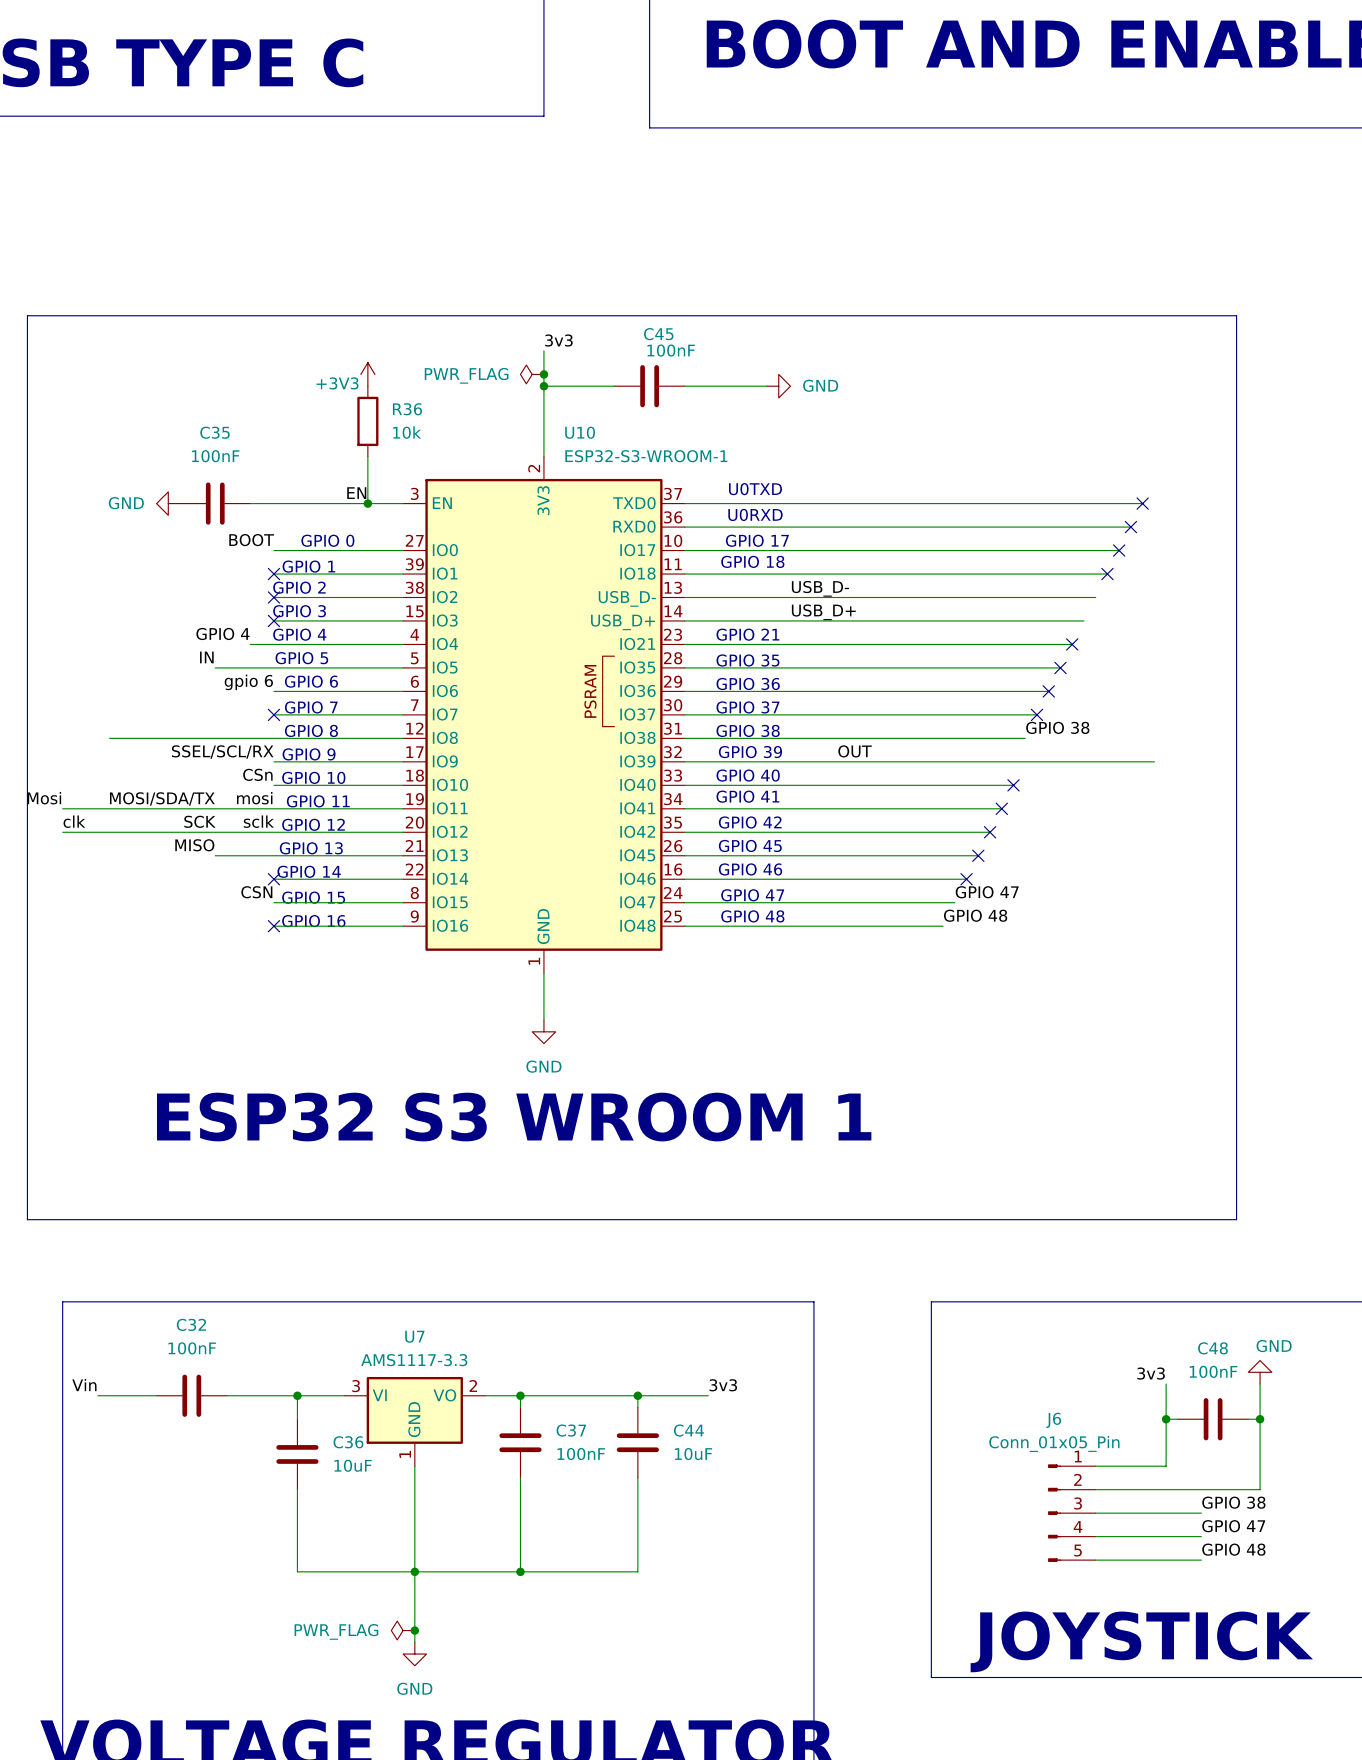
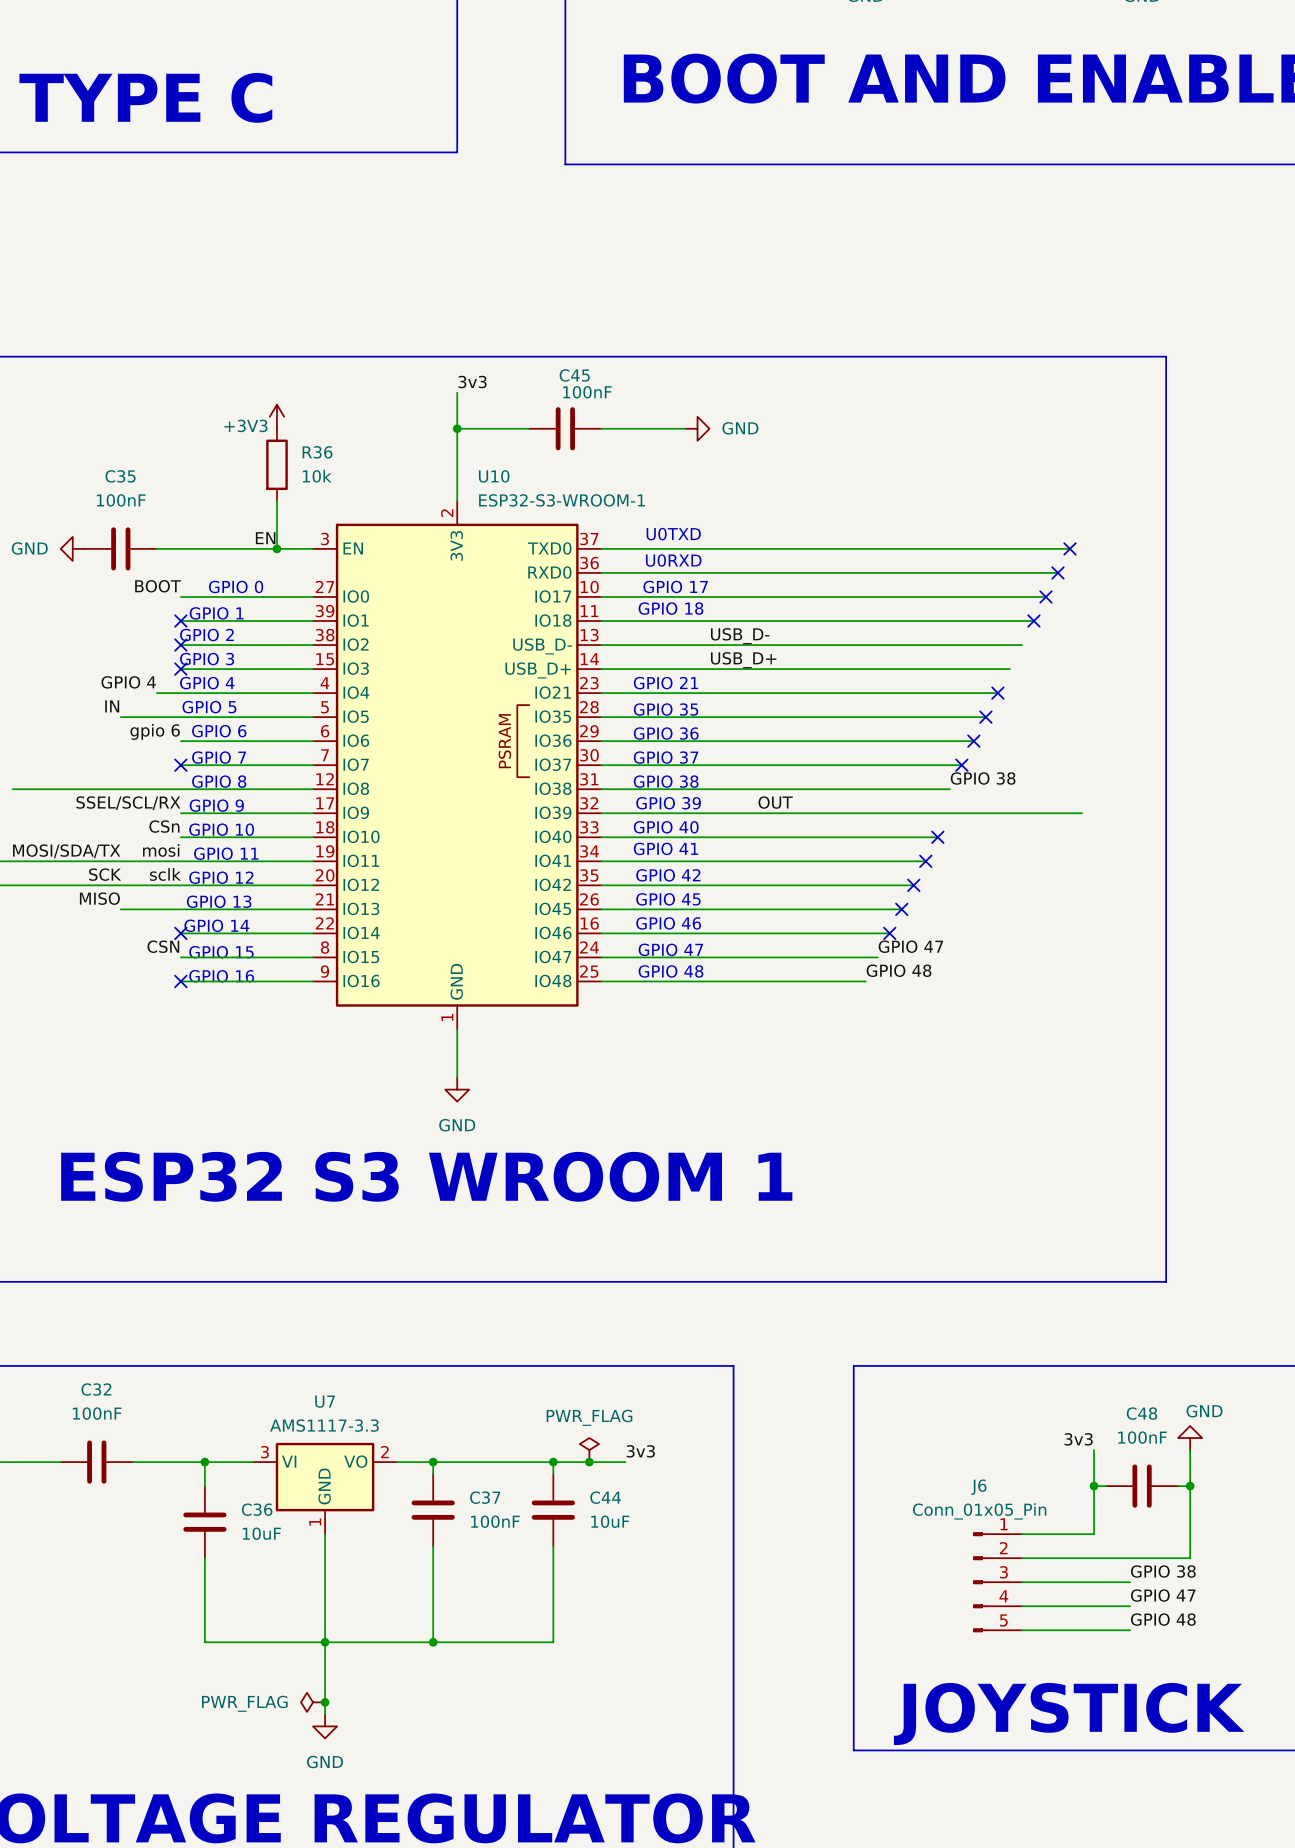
power symbol: PWR_FLAG (532, 374) -> none
junction: (543, 374) -> none
power symbol: none -> PWR_FLAG (589, 1450)
junction: none -> (589, 1462)

